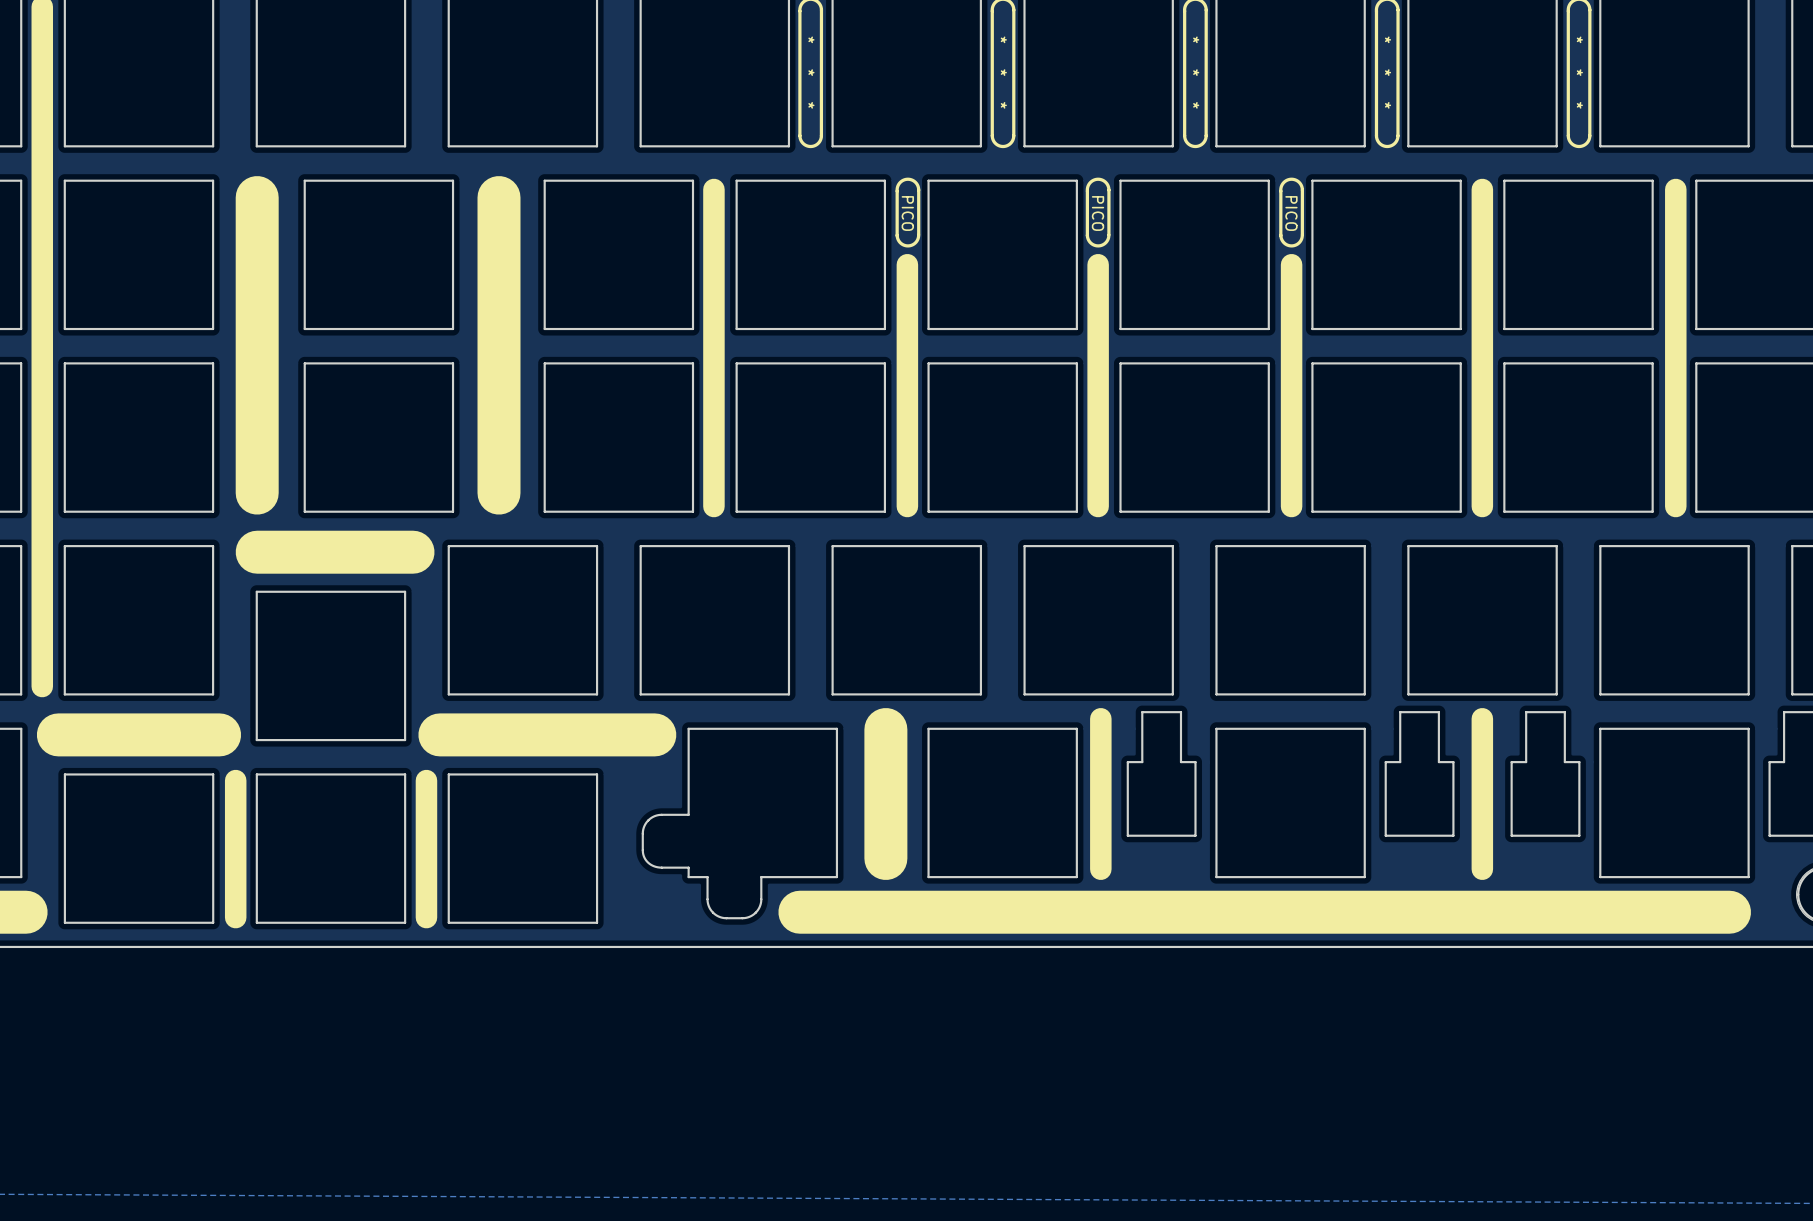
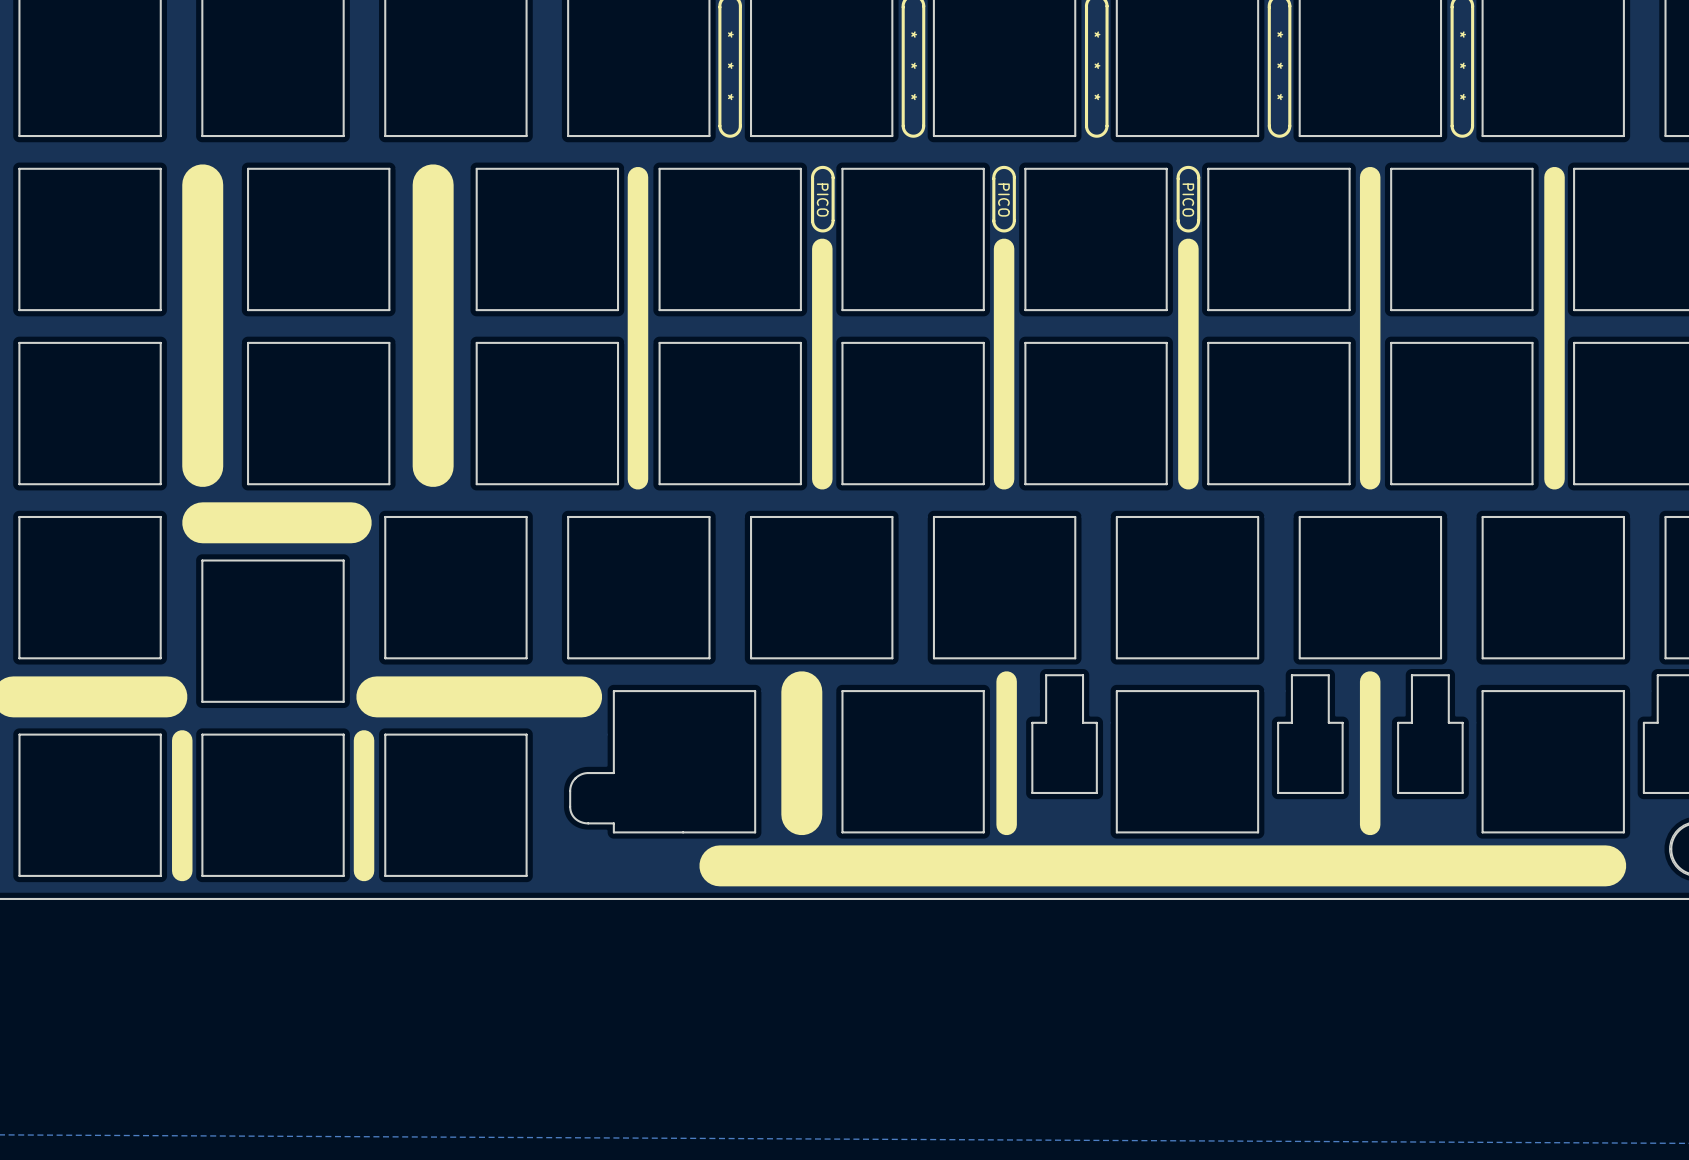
board edge: (761, 877) (759, 907) (752, 915) (742, 918) (721, 917) (711, 911) (707, 902) (707, 877) -> (683, 832) (631, 832)

